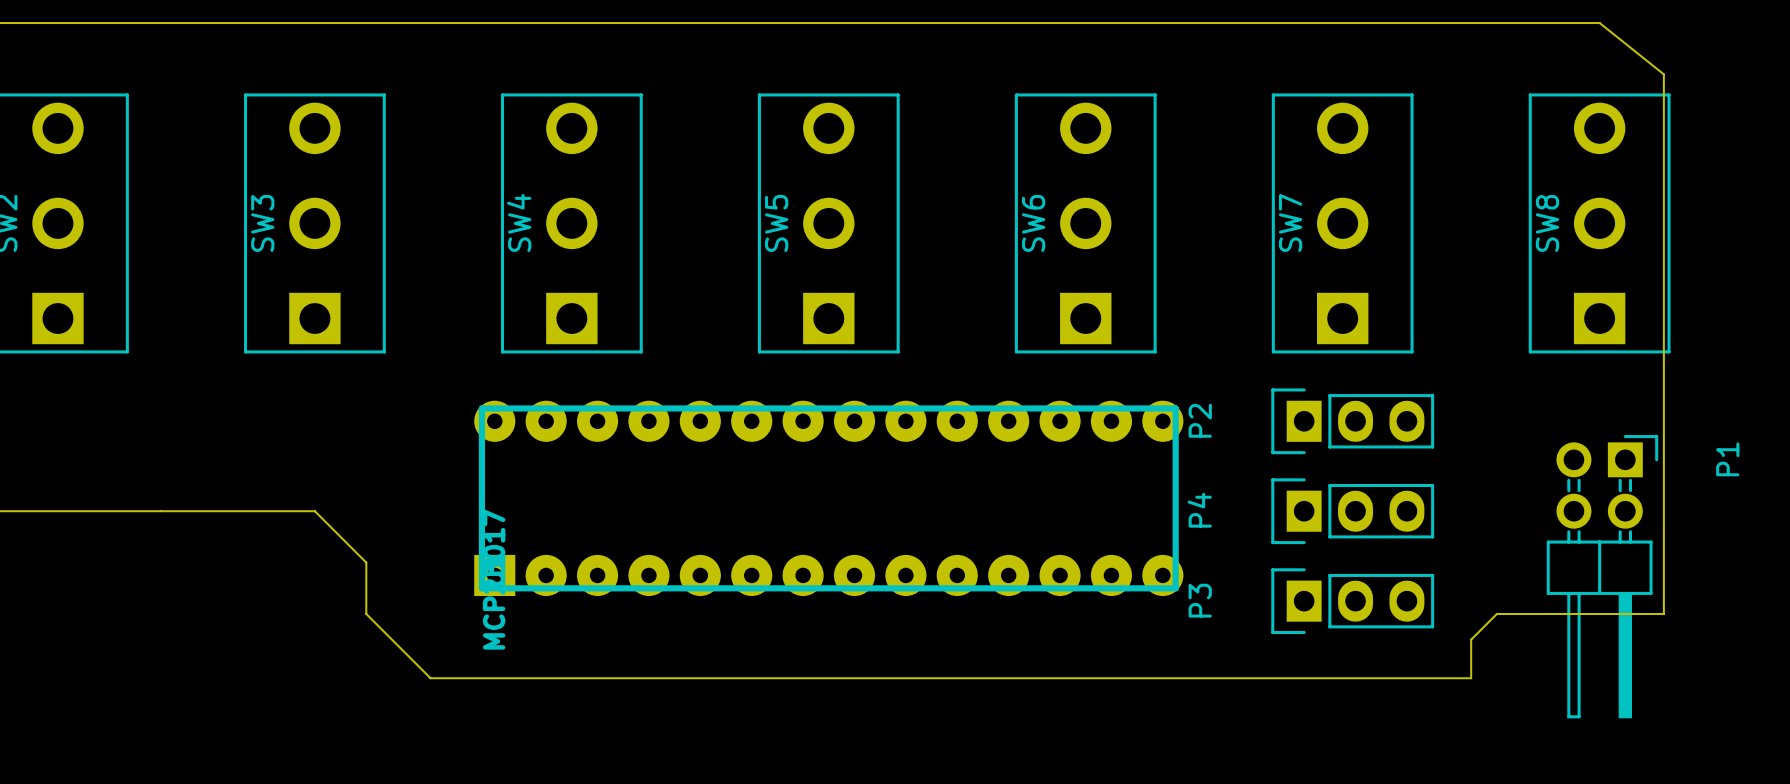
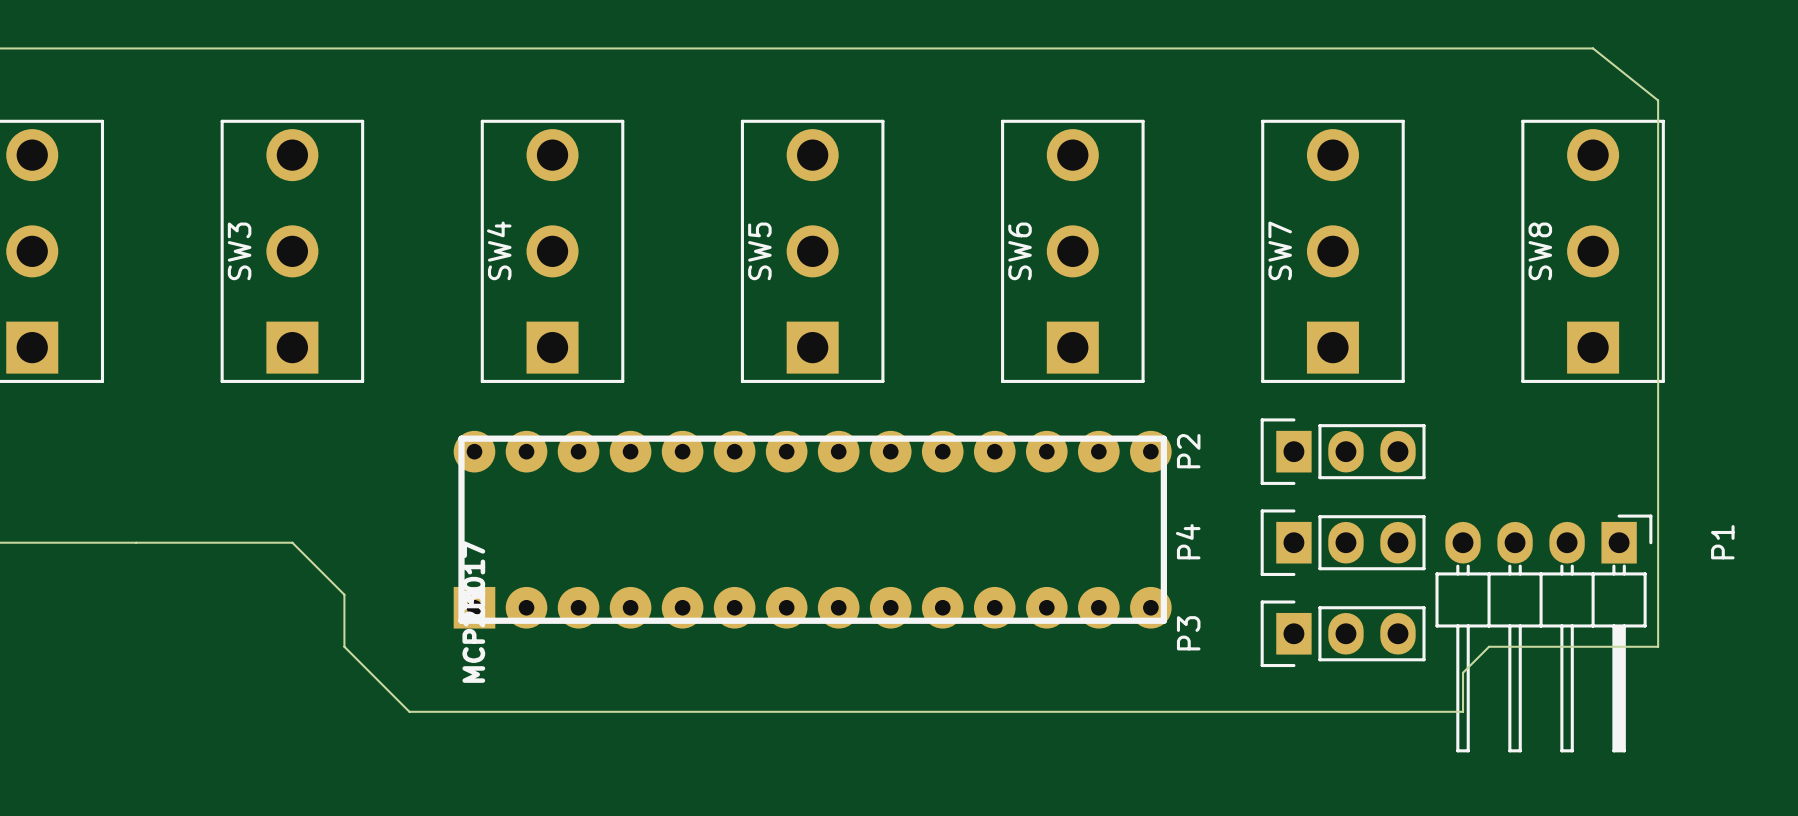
P1 footprint: [1546, 435, 1659, 719] -> [1435, 514, 1653, 753]
P1 name position: P1 (1727, 459) -> P1 (1722, 542)

